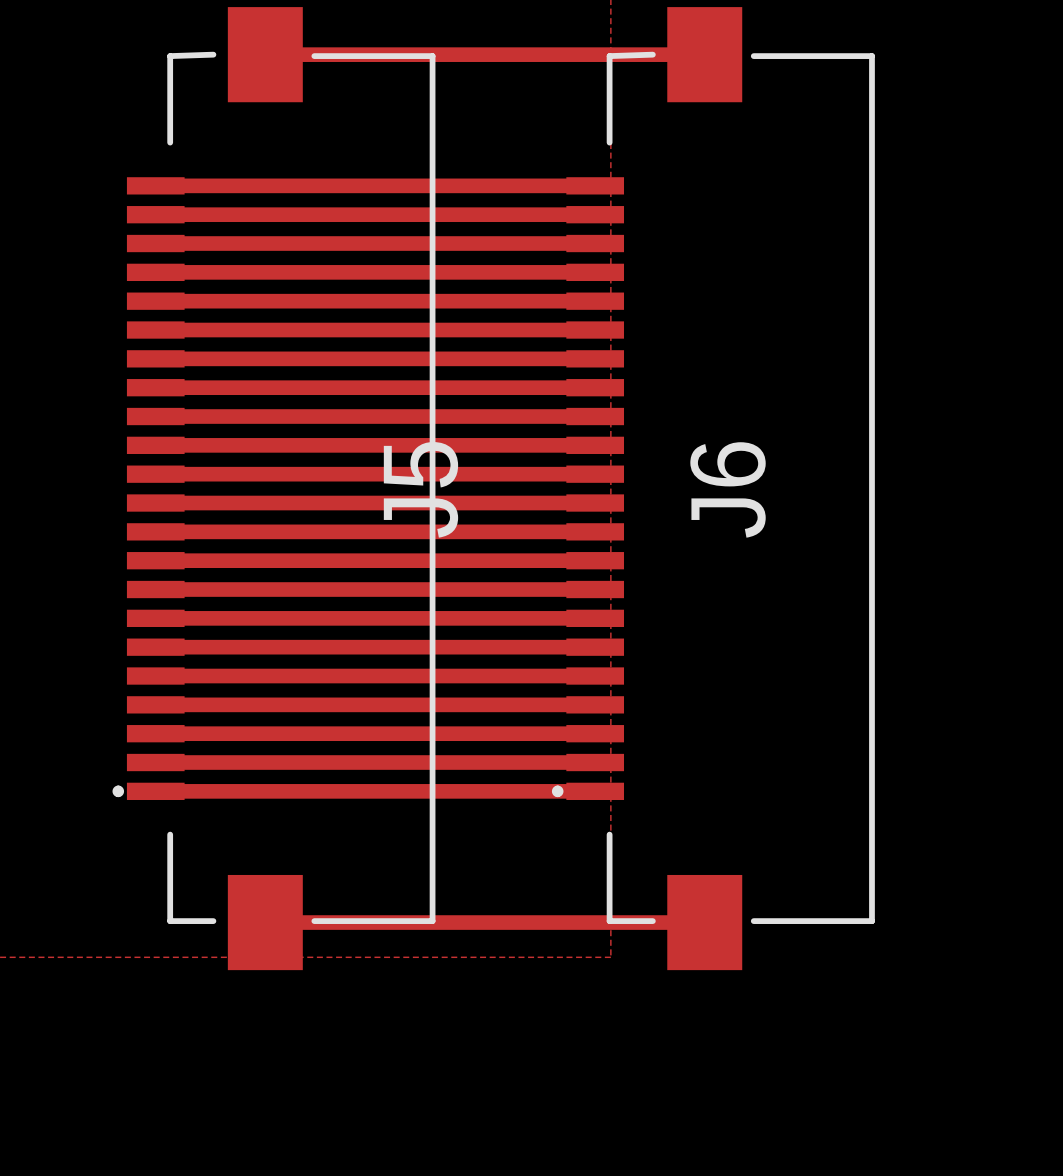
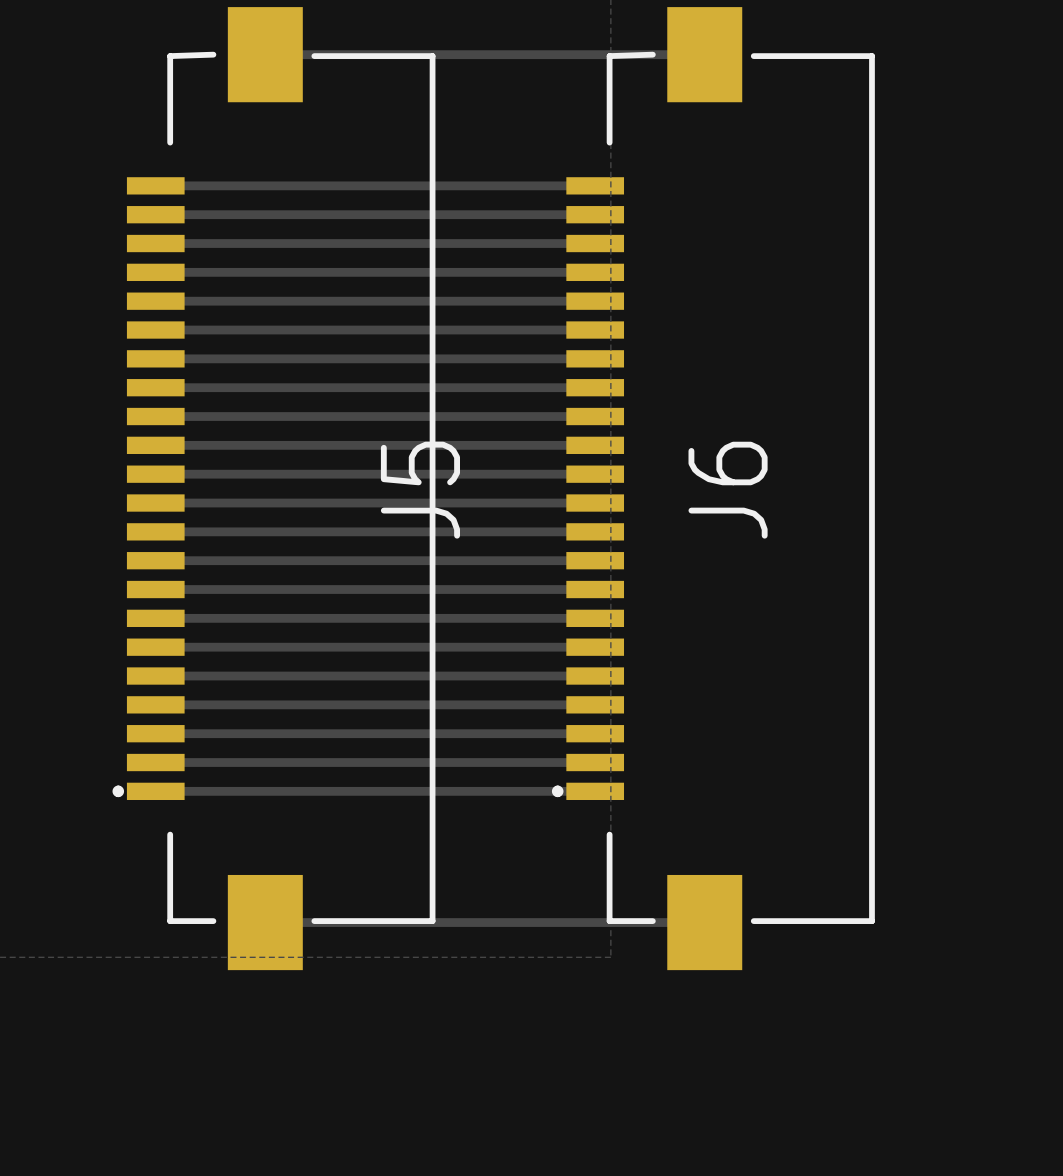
track width: thick (265, 54) (704, 54) -> thin (265, 54) (704, 54)
track width: thick (155, 185) (595, 185) -> thin (155, 185) (595, 185)
track width: thick (155, 214) (595, 214) -> thin (155, 214) (595, 214)
track width: thick (155, 243) (595, 243) -> thin (155, 243) (595, 243)
track width: thick (155, 272) (595, 272) -> thin (155, 272) (595, 272)
track width: thick (155, 301) (595, 301) -> thin (155, 301) (595, 301)
track width: thick (155, 330) (595, 330) -> thin (155, 330) (595, 330)
track width: thick (155, 358) (595, 358) -> thin (155, 358) (595, 358)
track width: thick (155, 387) (595, 387) -> thin (155, 387) (595, 387)
track width: thick (155, 416) (595, 416) -> thin (155, 416) (595, 416)
track width: thick (155, 445) (595, 445) -> thin (155, 445) (595, 445)
track width: thick (155, 474) (595, 474) -> thin (155, 474) (595, 474)
track width: thick (155, 503) (595, 503) -> thin (155, 503) (595, 503)
track width: thick (155, 531) (595, 531) -> thin (155, 531) (595, 531)
track width: thick (155, 560) (595, 560) -> thin (155, 560) (595, 560)
track width: thick (155, 589) (595, 589) -> thin (155, 589) (595, 589)
track width: thick (155, 618) (595, 618) -> thin (155, 618) (595, 618)
track width: thick (155, 647) (595, 647) -> thin (155, 647) (595, 647)
track width: thick (155, 676) (595, 676) -> thin (155, 676) (595, 676)
track width: thick (155, 704) (595, 704) -> thin (155, 704) (595, 704)
track width: thick (155, 733) (595, 733) -> thin (155, 733) (595, 733)
track width: thick (155, 762) (595, 762) -> thin (155, 762) (595, 762)
track width: thick (155, 791) (595, 791) -> thin (155, 791) (595, 791)
track width: thick (265, 922) (704, 922) -> thin (265, 922) (704, 922)

